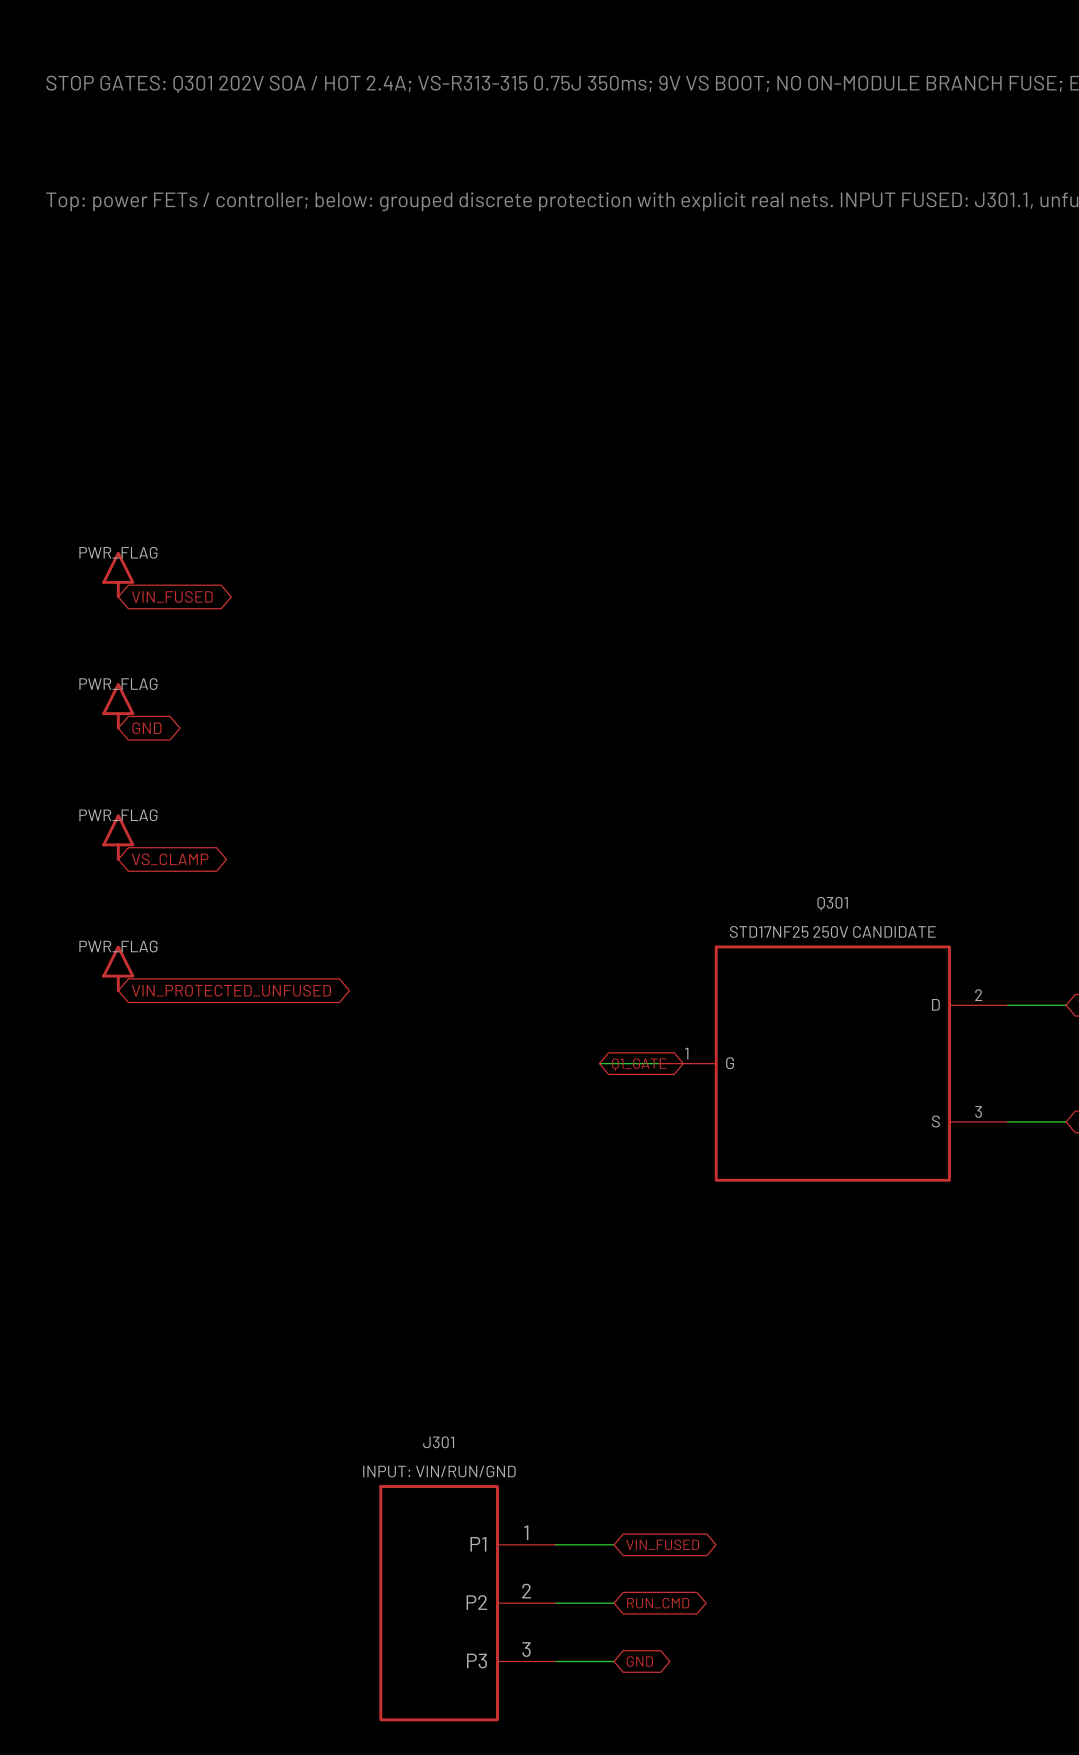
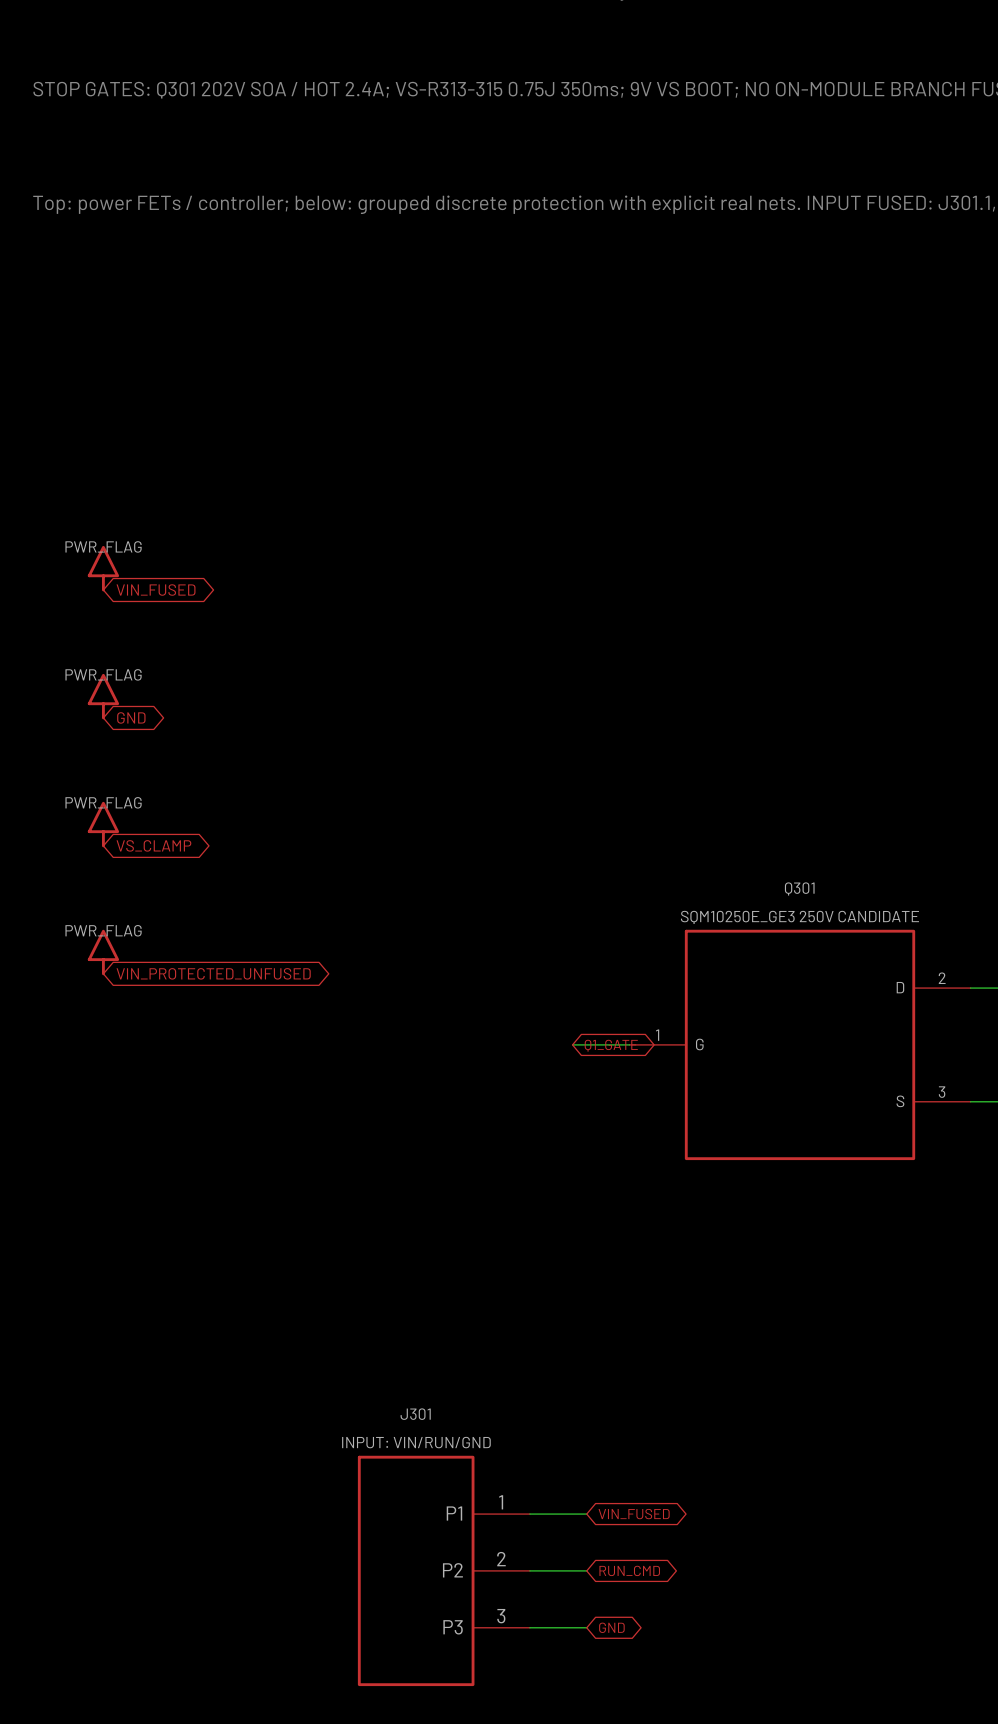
Q301 value: STD17NF25 250V CANDIDATE (832, 931) -> SQM10250E_GE3 250V CANDIDATE (799, 917)

